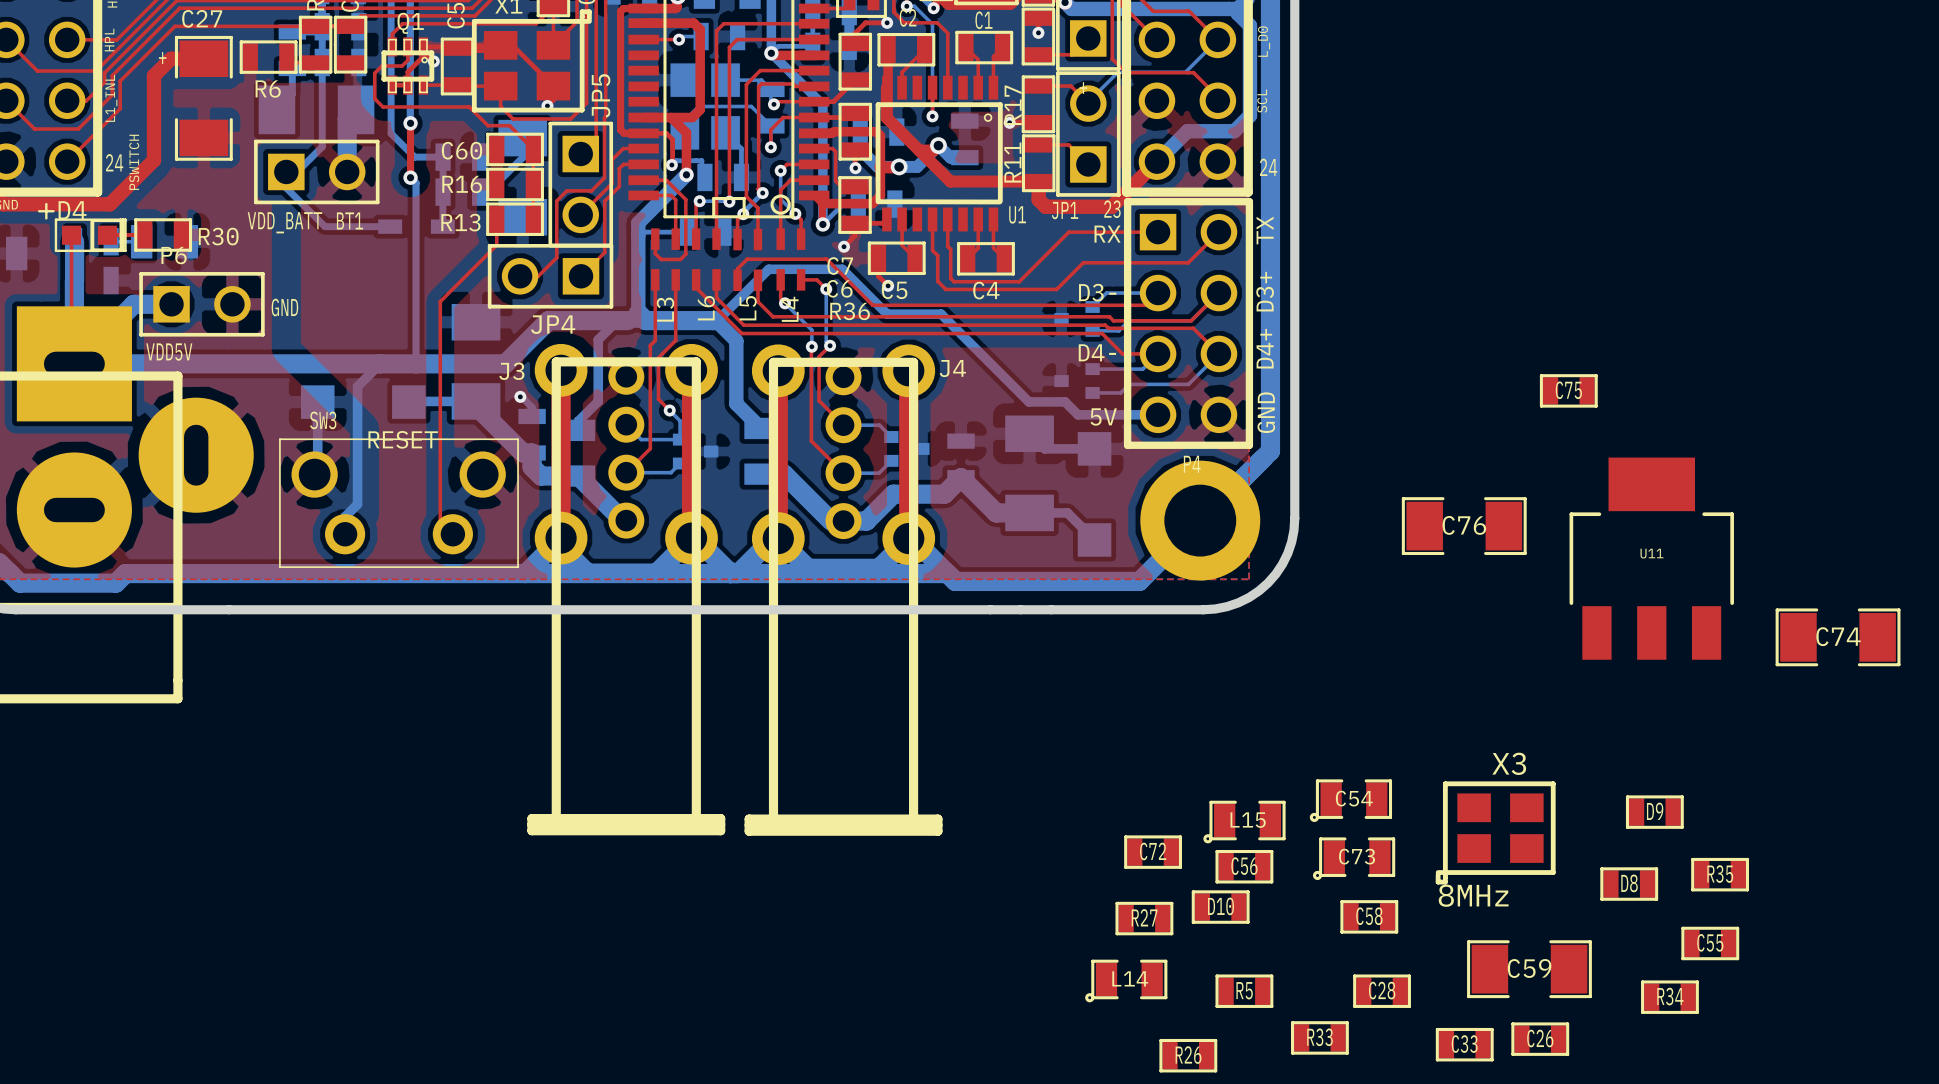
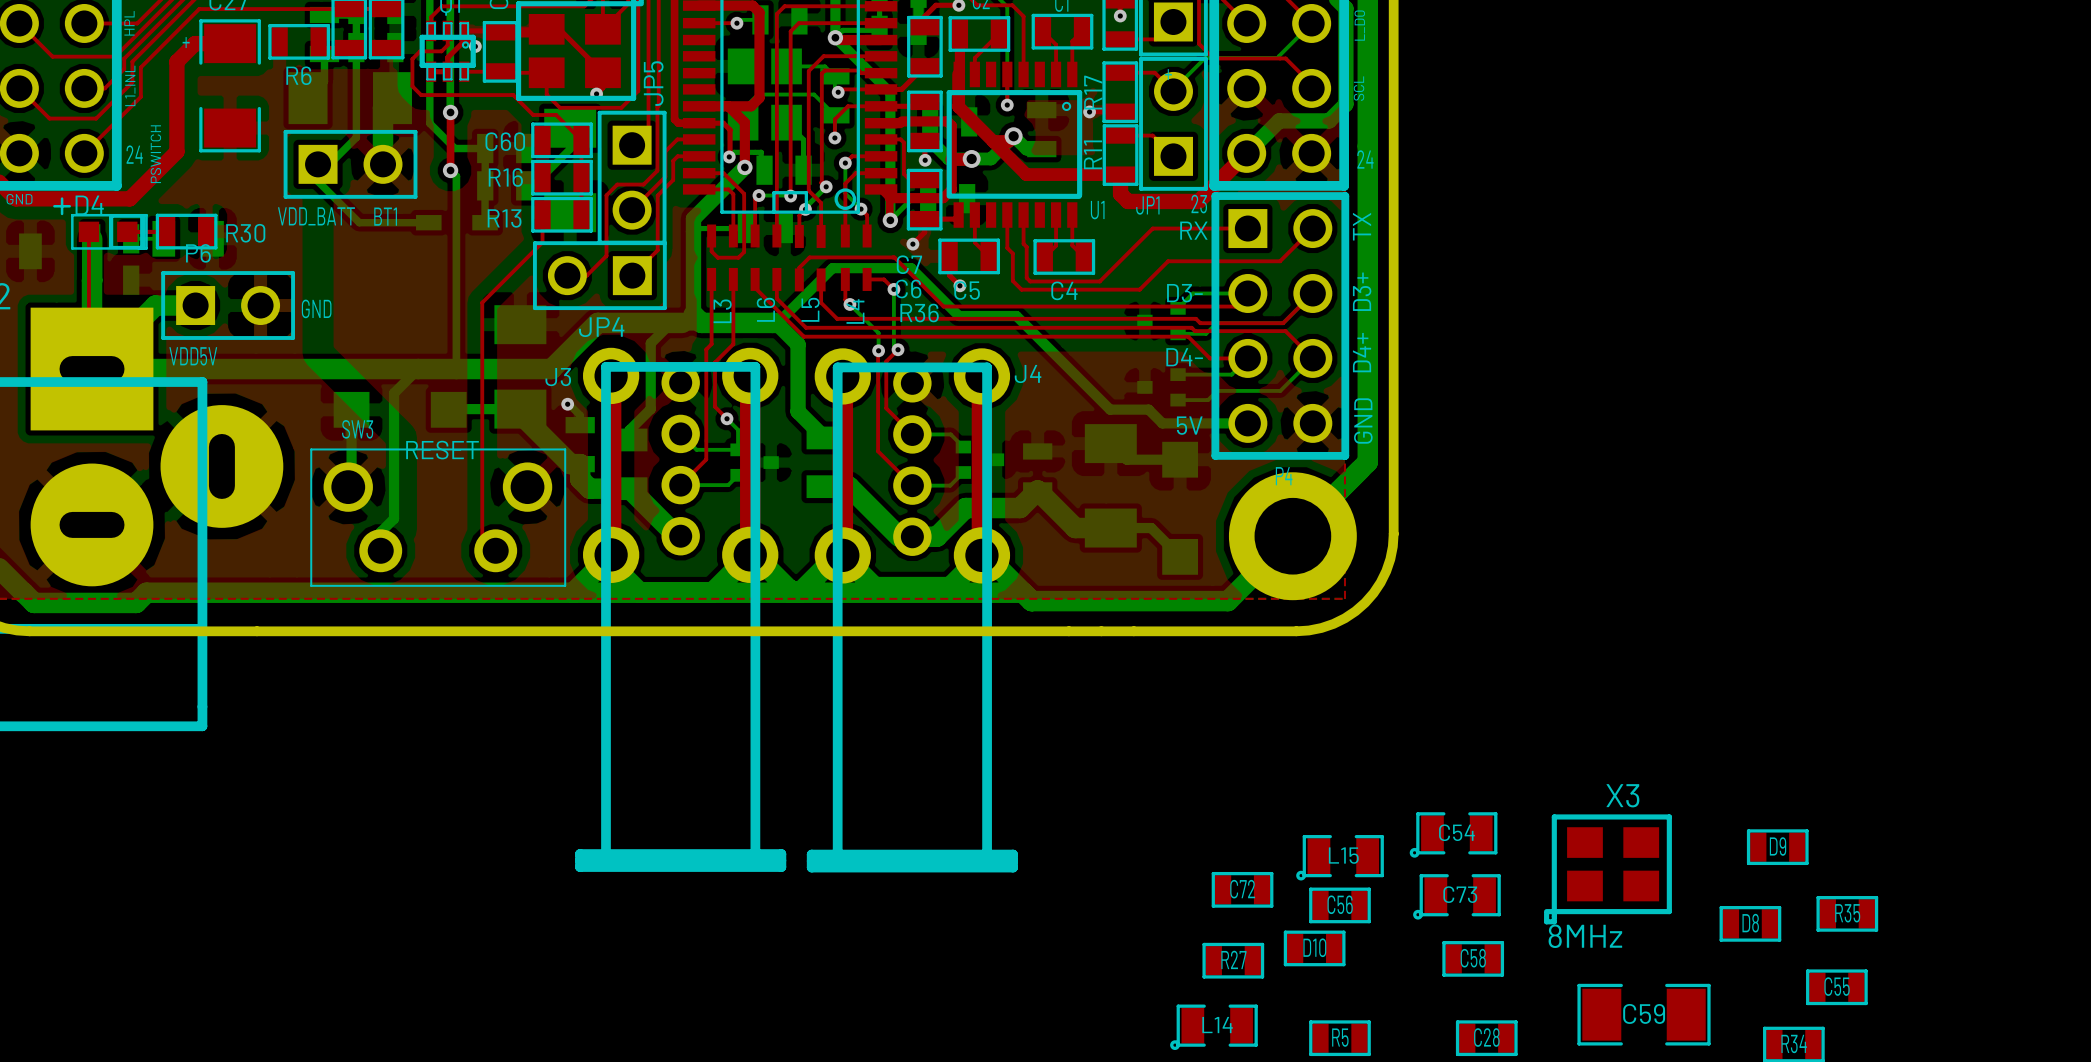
C75: (1568, 390) -> none
C76: (1464, 526) -> none
U11: (1651, 558) -> none
C74: (1838, 637) -> none

